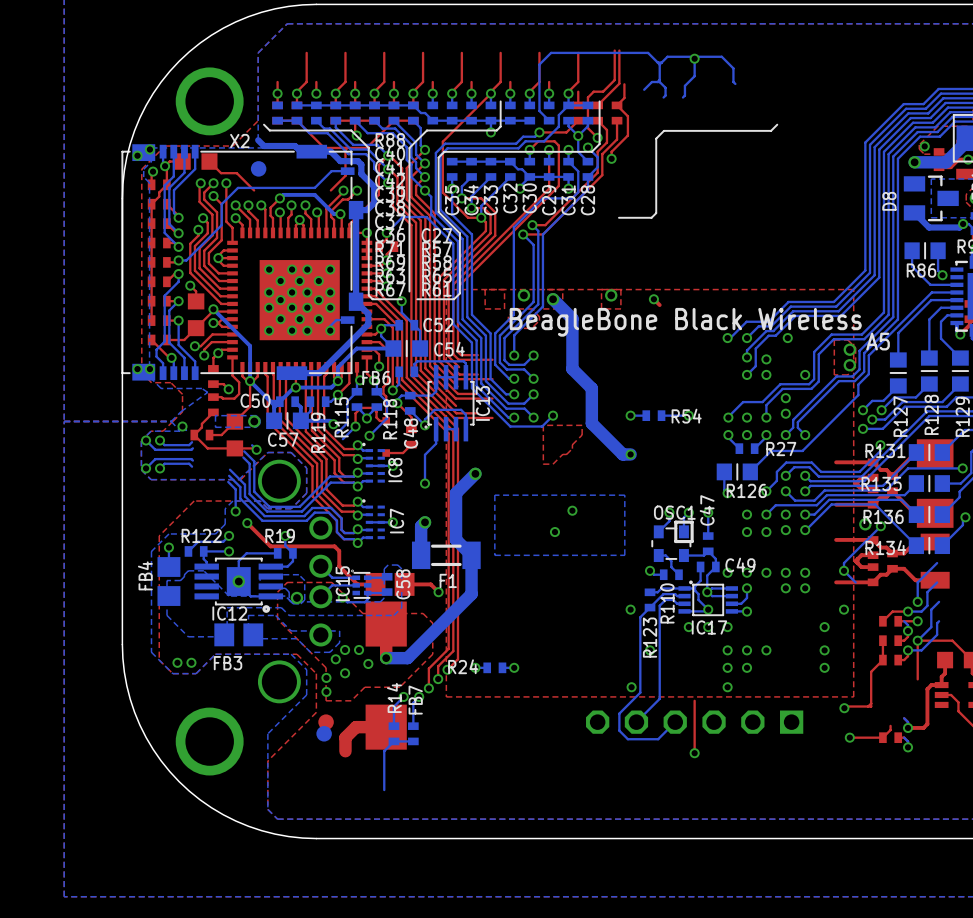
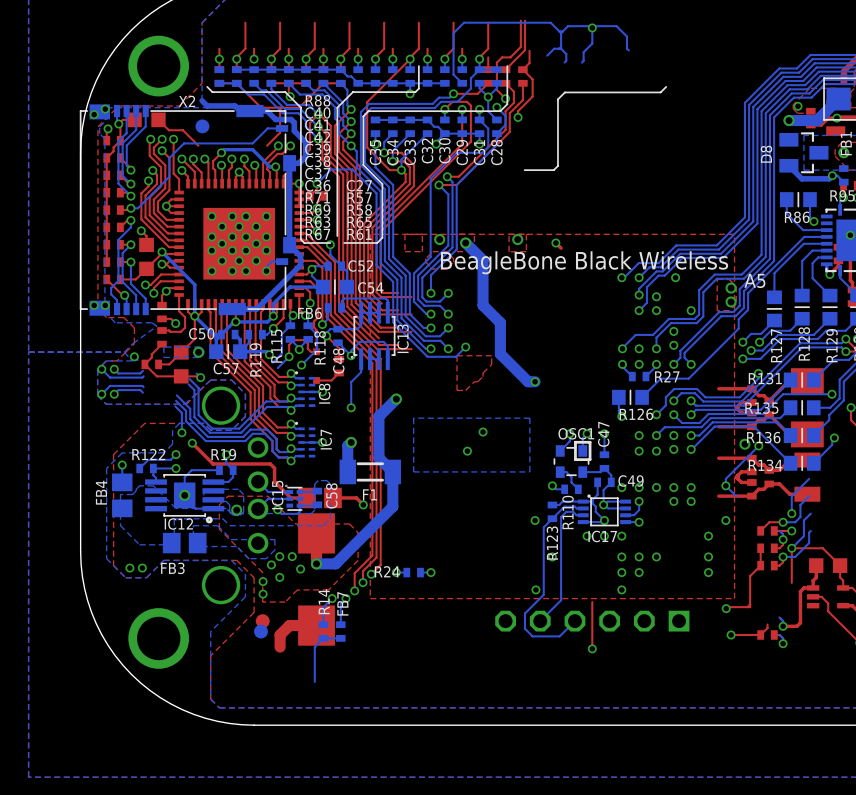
via: (630, 415) -> none
bottom track: (646, 415) (630, 415) -> none
R54: (653, 415) -> none
bottom track: (688, 415) (661, 415) -> none
via: (688, 415) -> none

